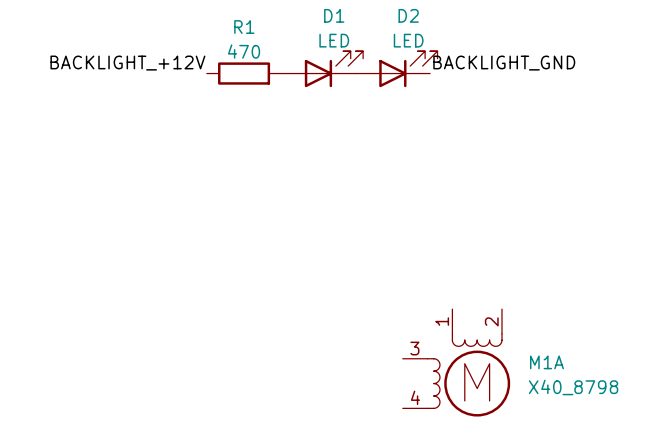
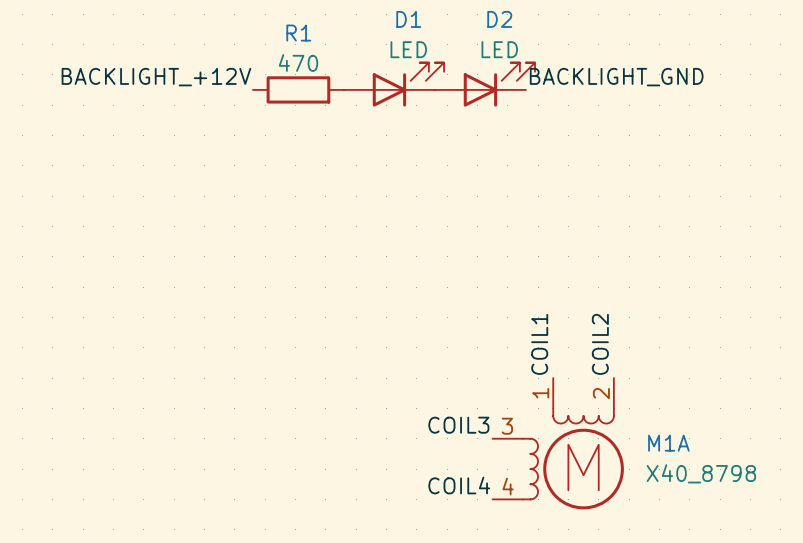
label: none -> COIL1 (539, 344)
label: none -> COIL2 (600, 344)
label: none -> COIL3 (458, 425)
label: none -> COIL4 (459, 485)

